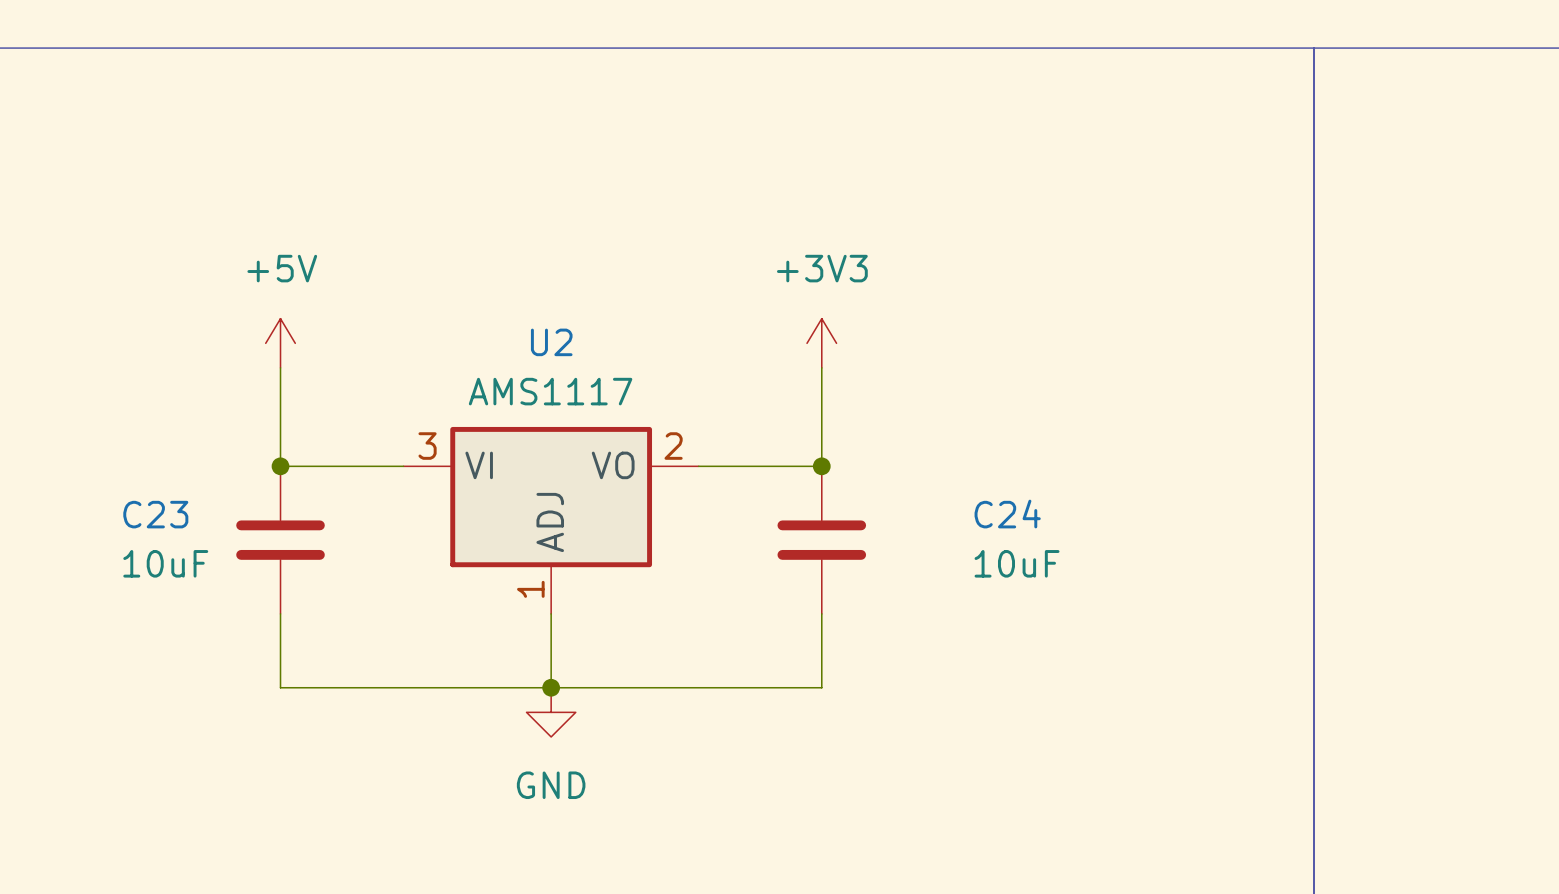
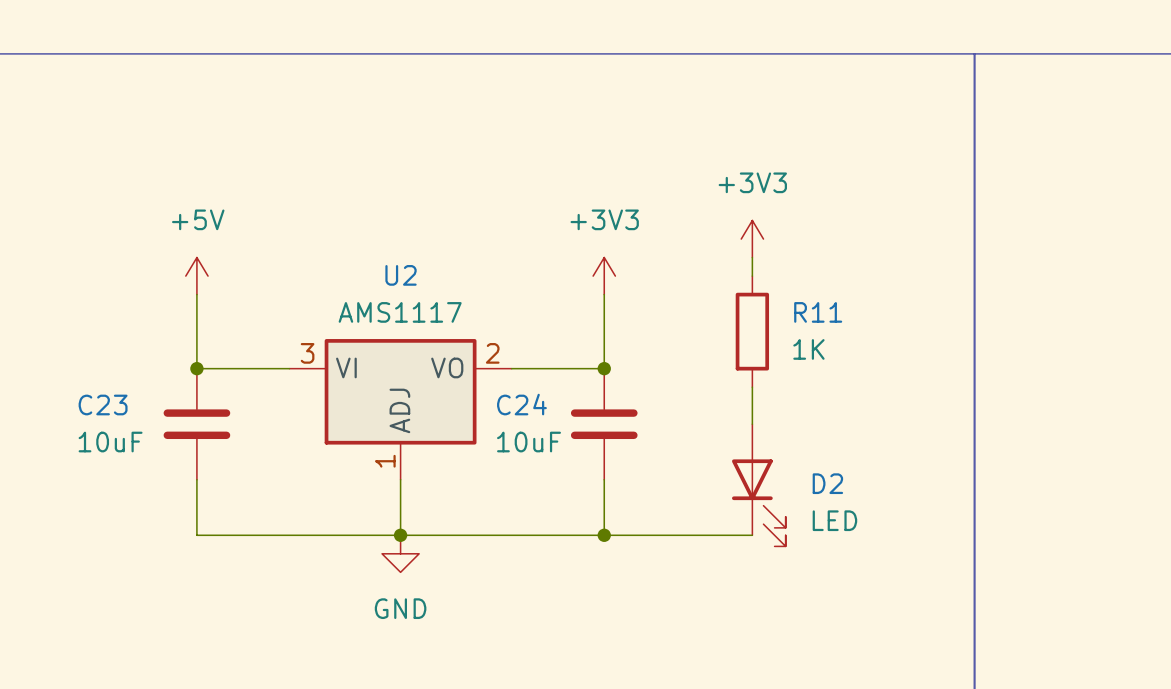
power symbol: none -> +3V3 (752, 239)
wire: none -> (752, 257) (752, 276)
R11: none -> 1K (752, 331)
wire: none -> (752, 387) (752, 424)
C24 name position: C24 (1007, 514) -> C24 (521, 404)
C24 value position: 10uF (1017, 563) -> 10uF (529, 442)
D2: none -> LED (758, 485)
wire: none -> (604, 535) (752, 535)
junction: none -> (604, 535)

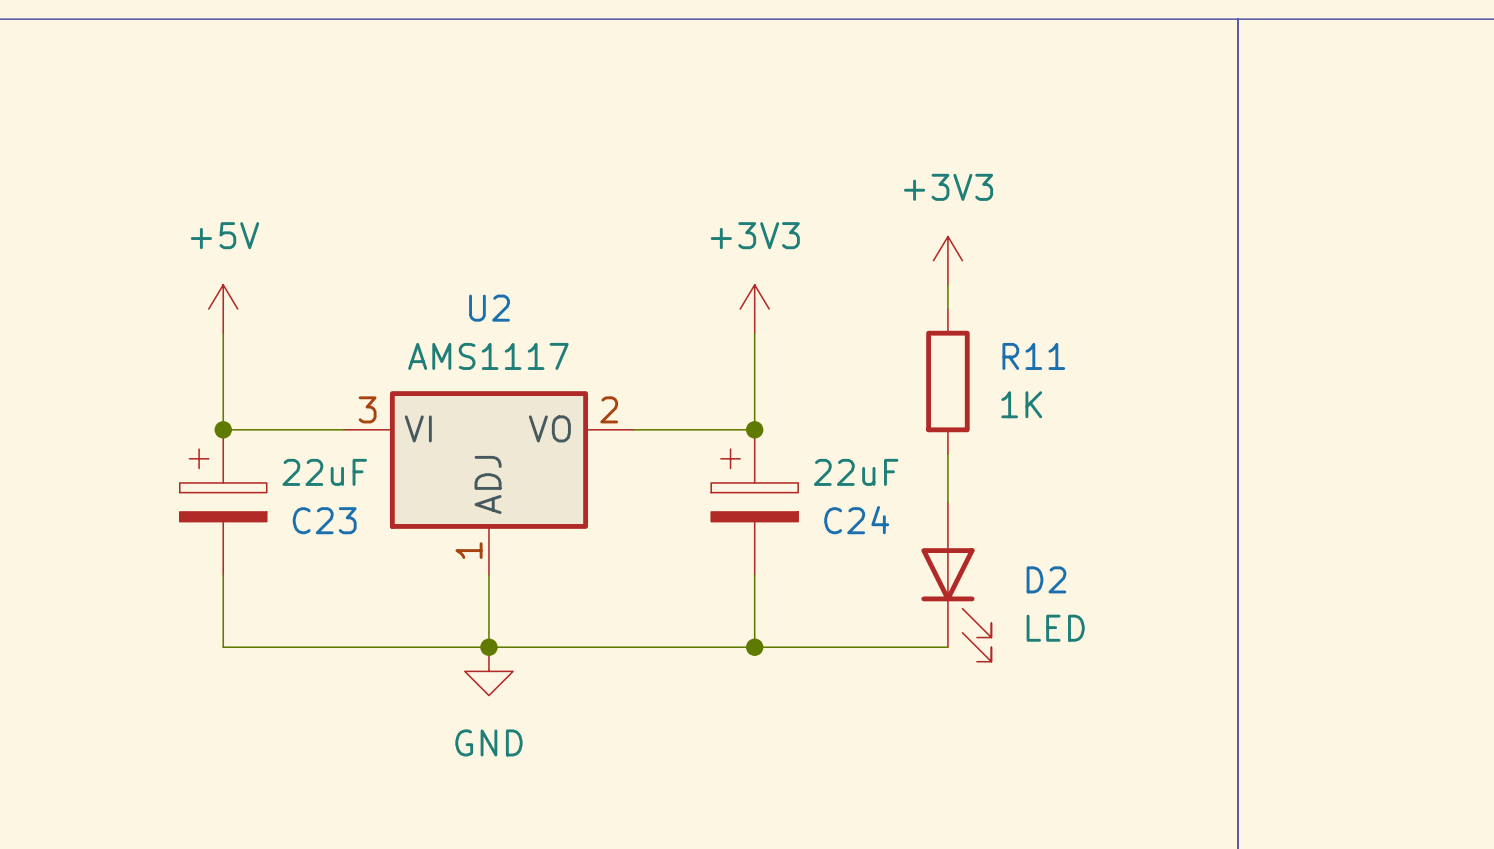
C23 symbol: [163, 368, 231, 480] -> [179, 429, 267, 575]
C24 symbol: [570, 368, 638, 480] -> [711, 429, 799, 575]
C23 name position: C23 (103, 404) -> C23 (324, 520)
C24 name position: C24 (521, 404) -> C24 (856, 520)
C23 value: 10uF (110, 442) -> 22uF (324, 472)
C24 value: 10uF (529, 442) -> 22uF (856, 472)

